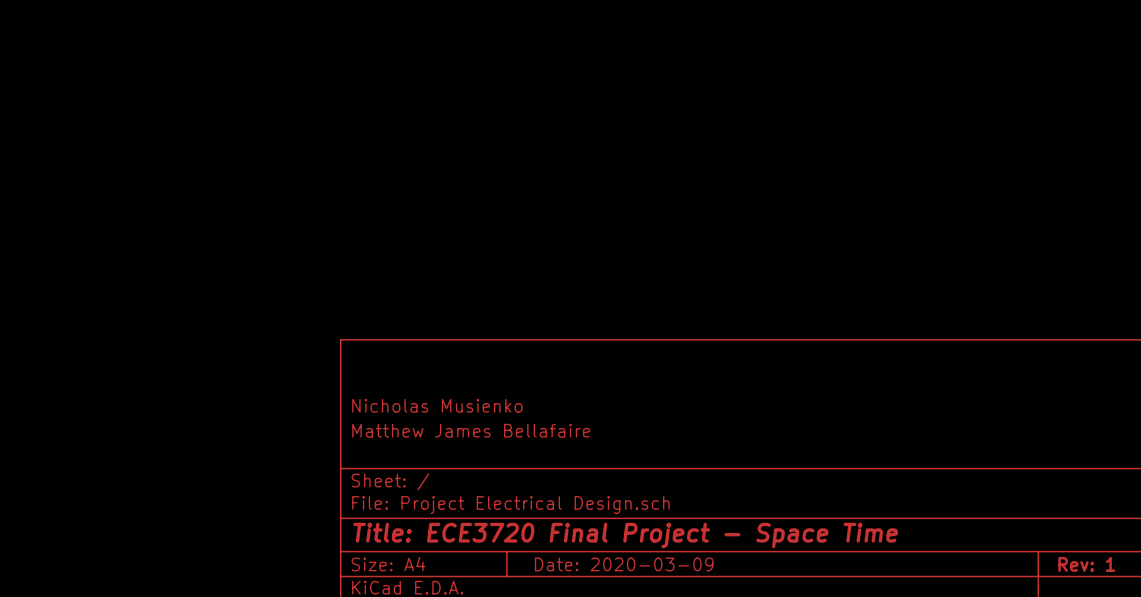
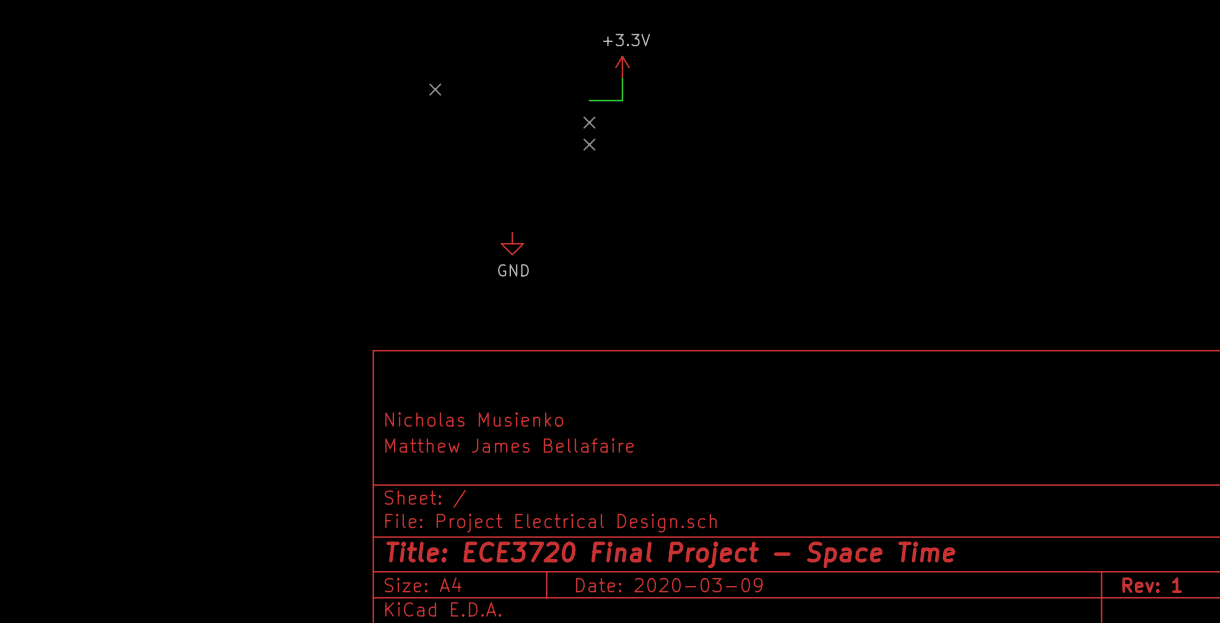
power symbol: none -> +3.3V (622, 67)
wire: none -> (622, 78) (622, 100) (589, 100)
no-connect mark: none -> (435, 89)
no-connect mark: none -> (589, 122)
no-connect mark: none -> (589, 144)
power symbol: none -> GND (512, 243)

